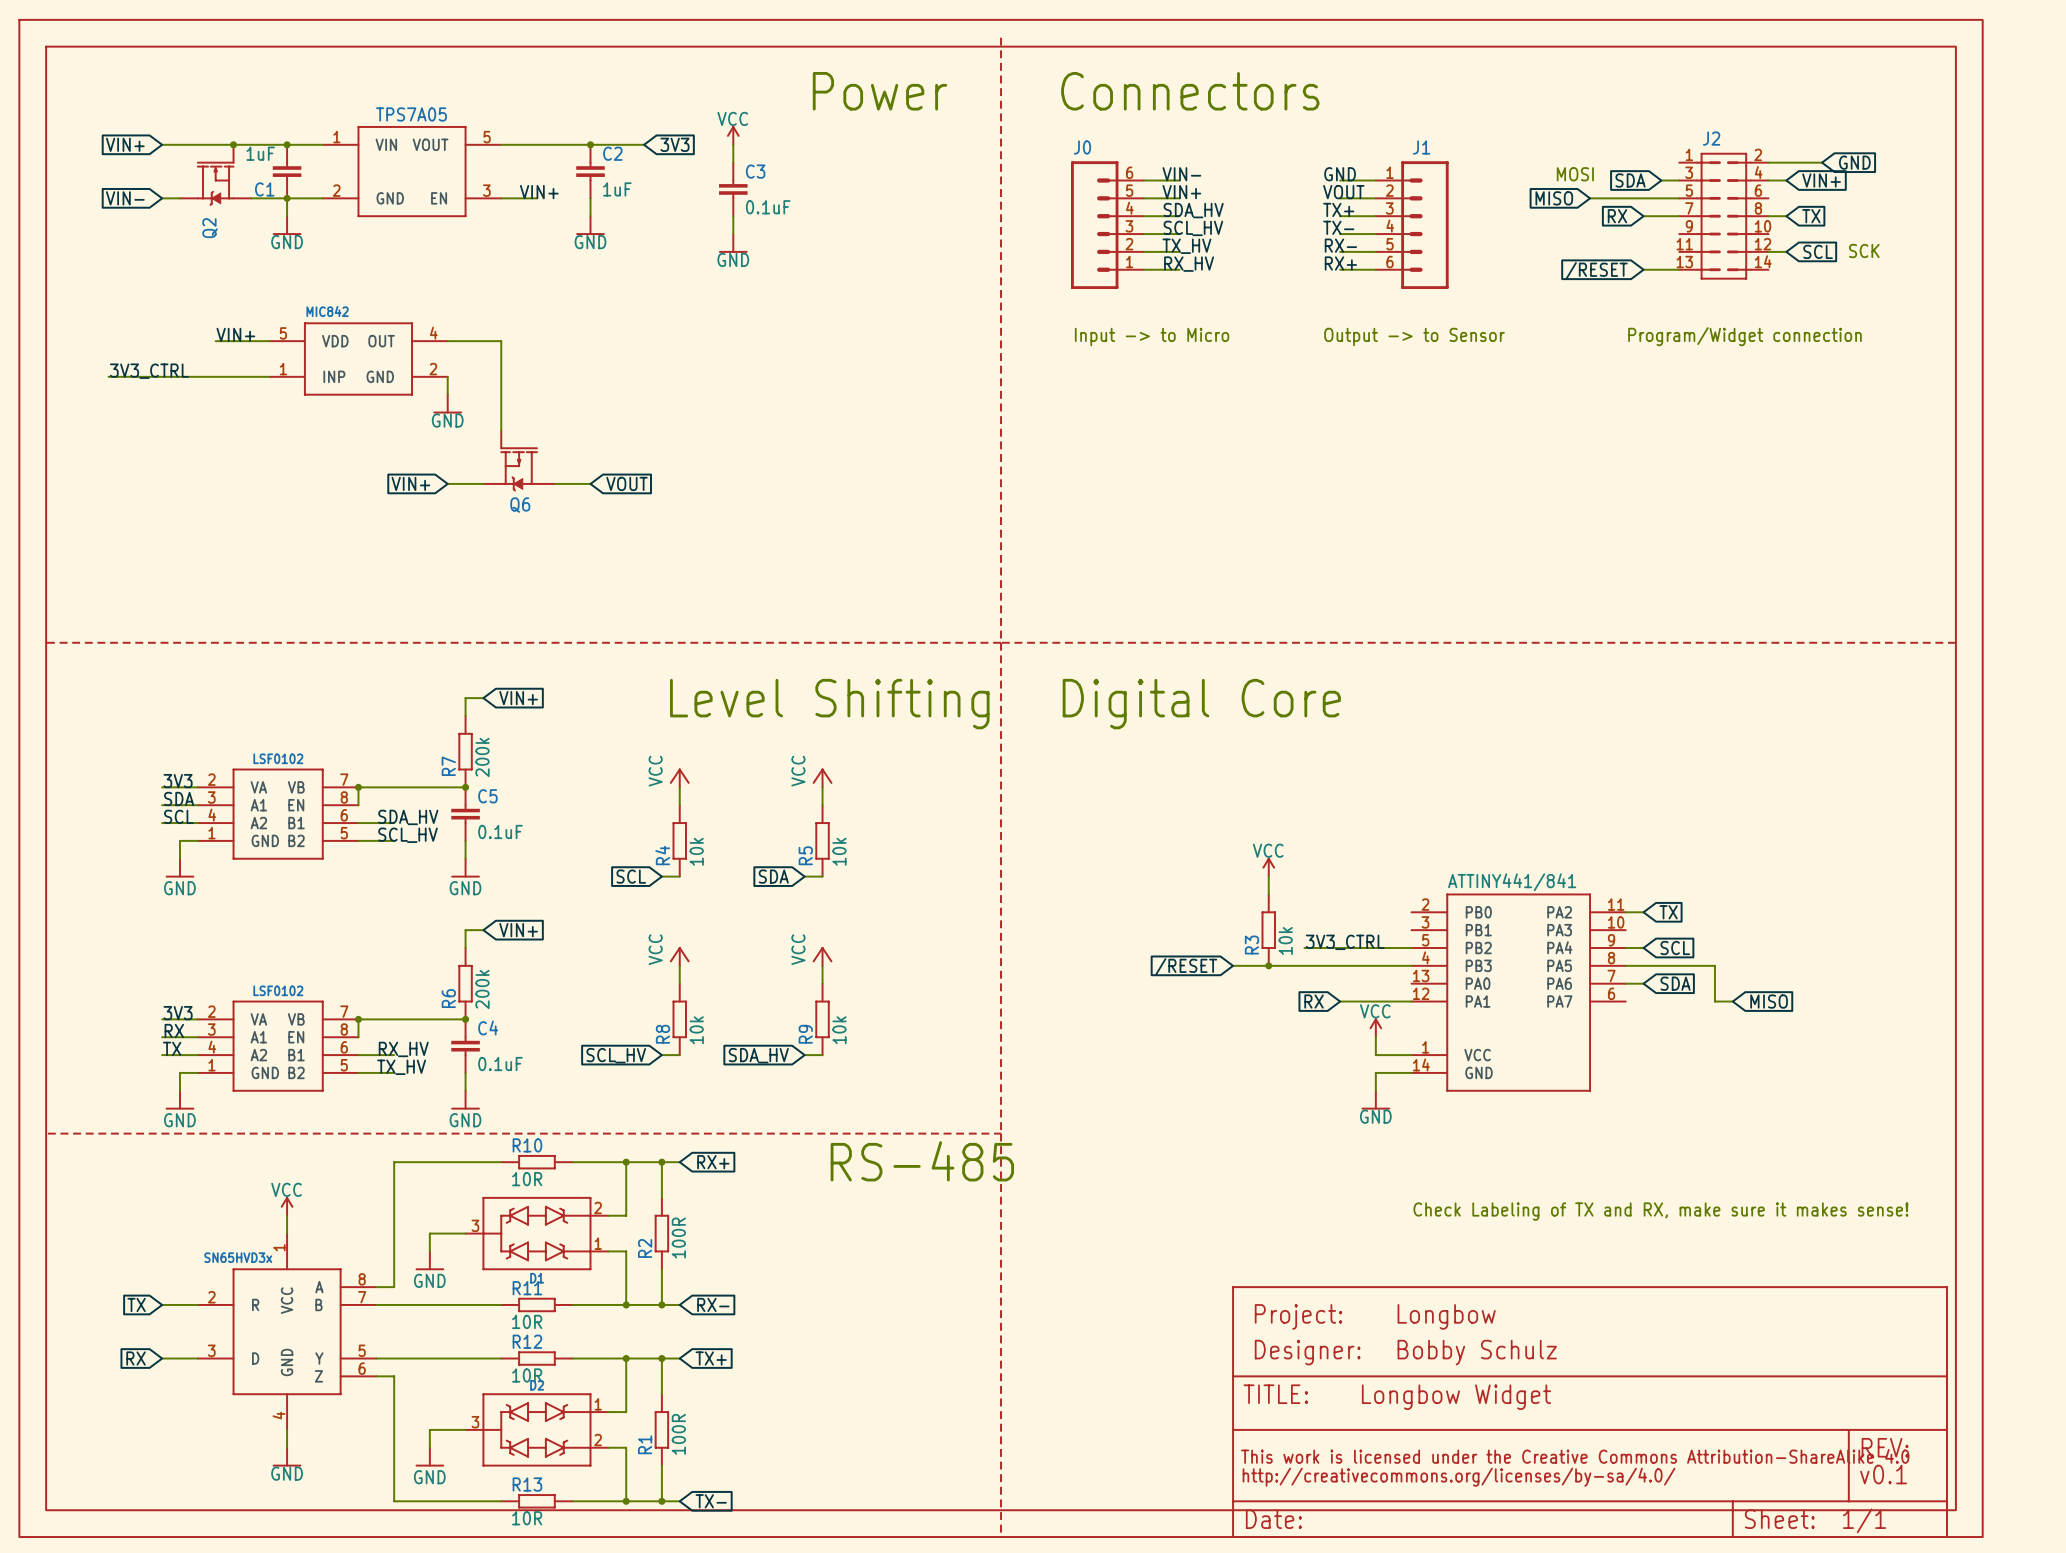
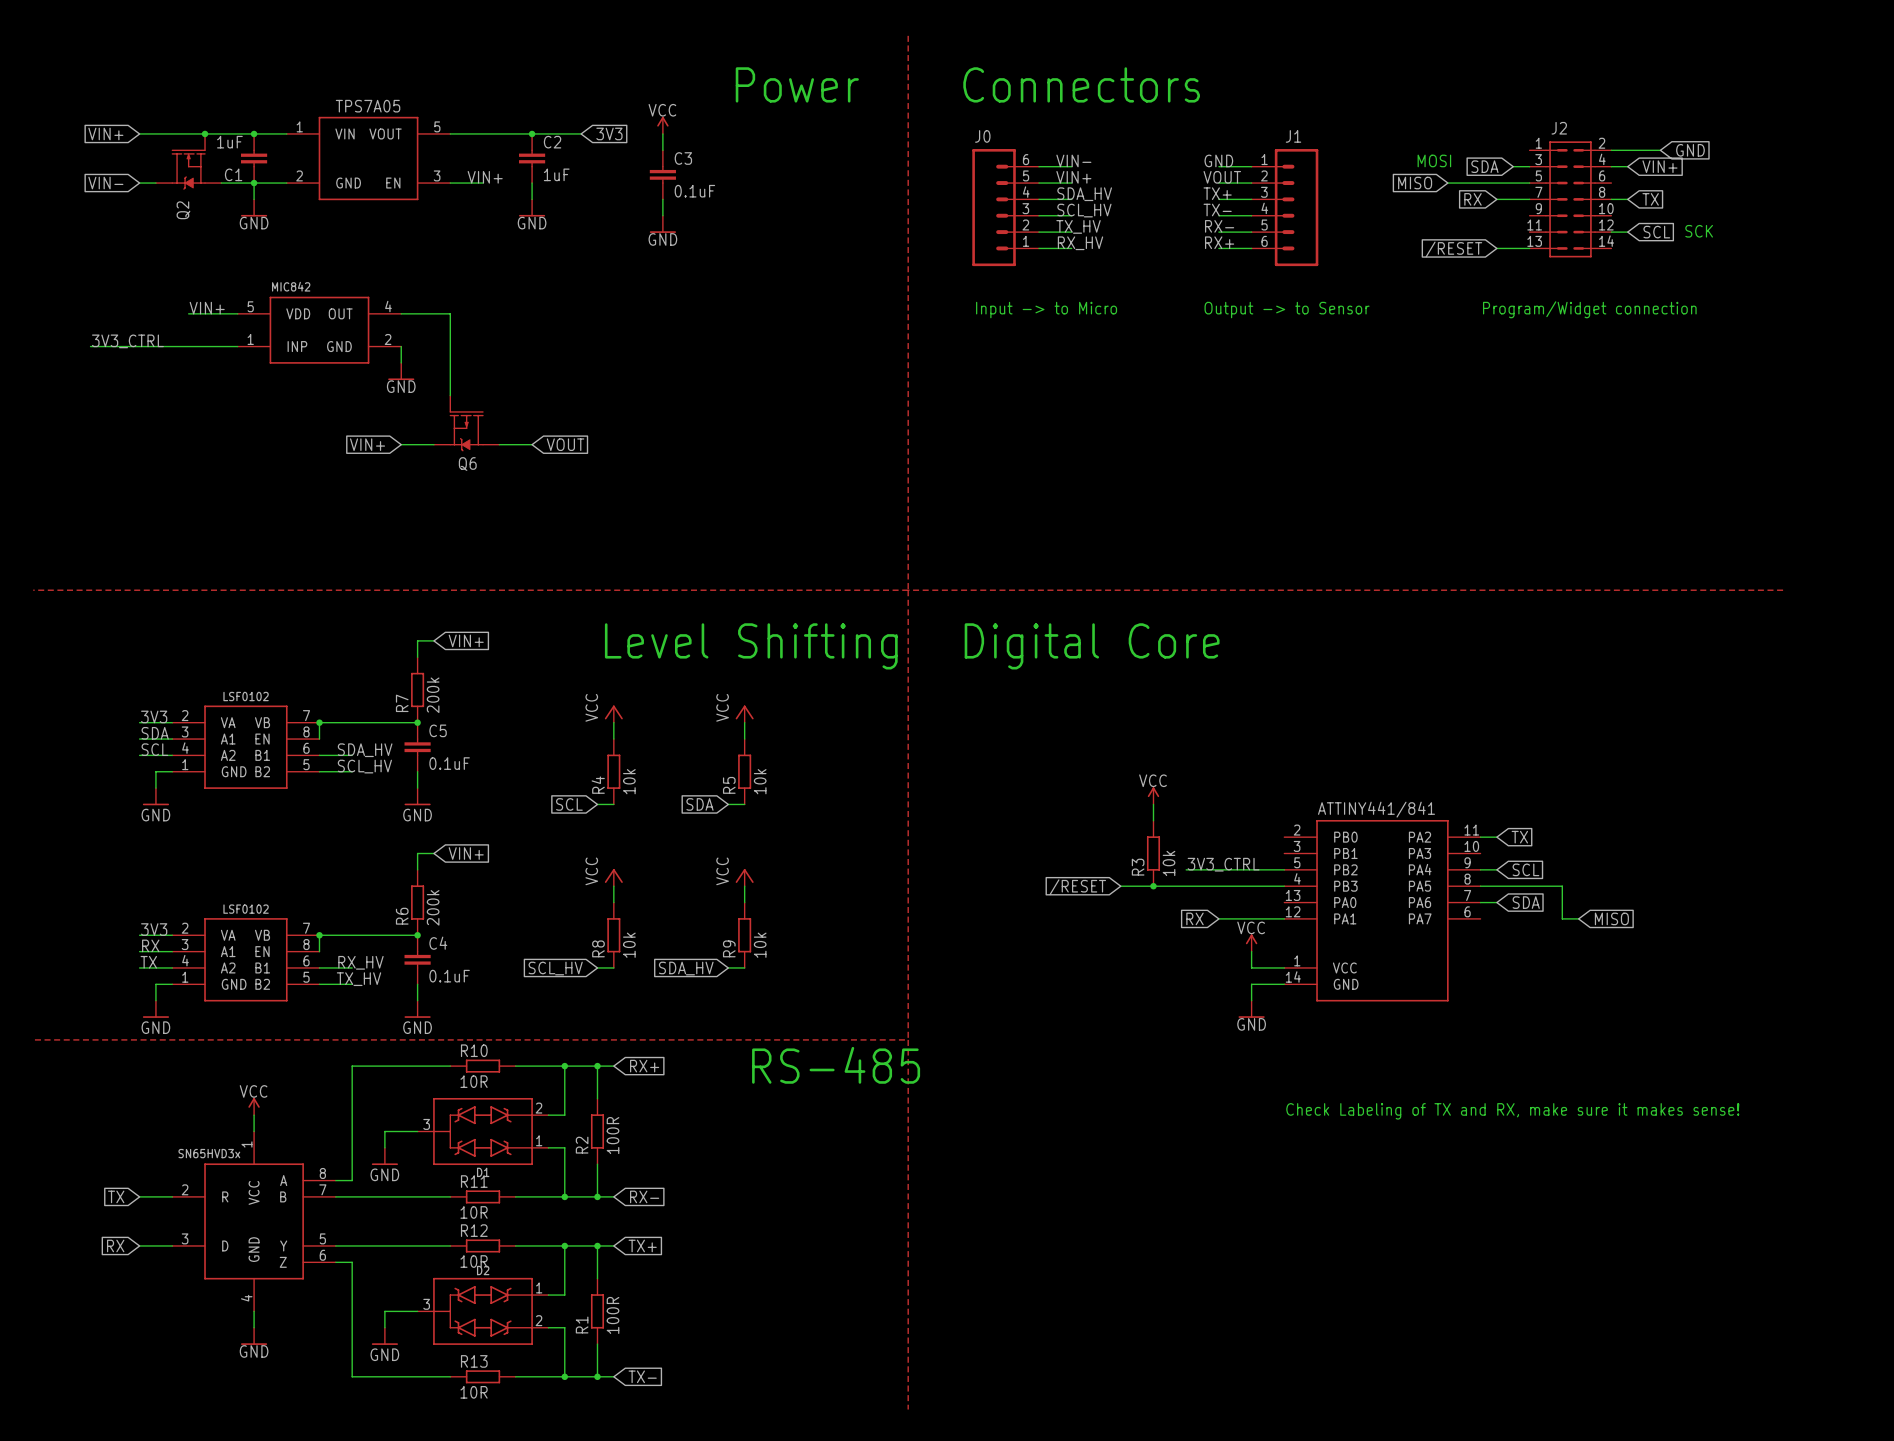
part: (1001, 778) -> none
part: (1590, 1412) -> none

